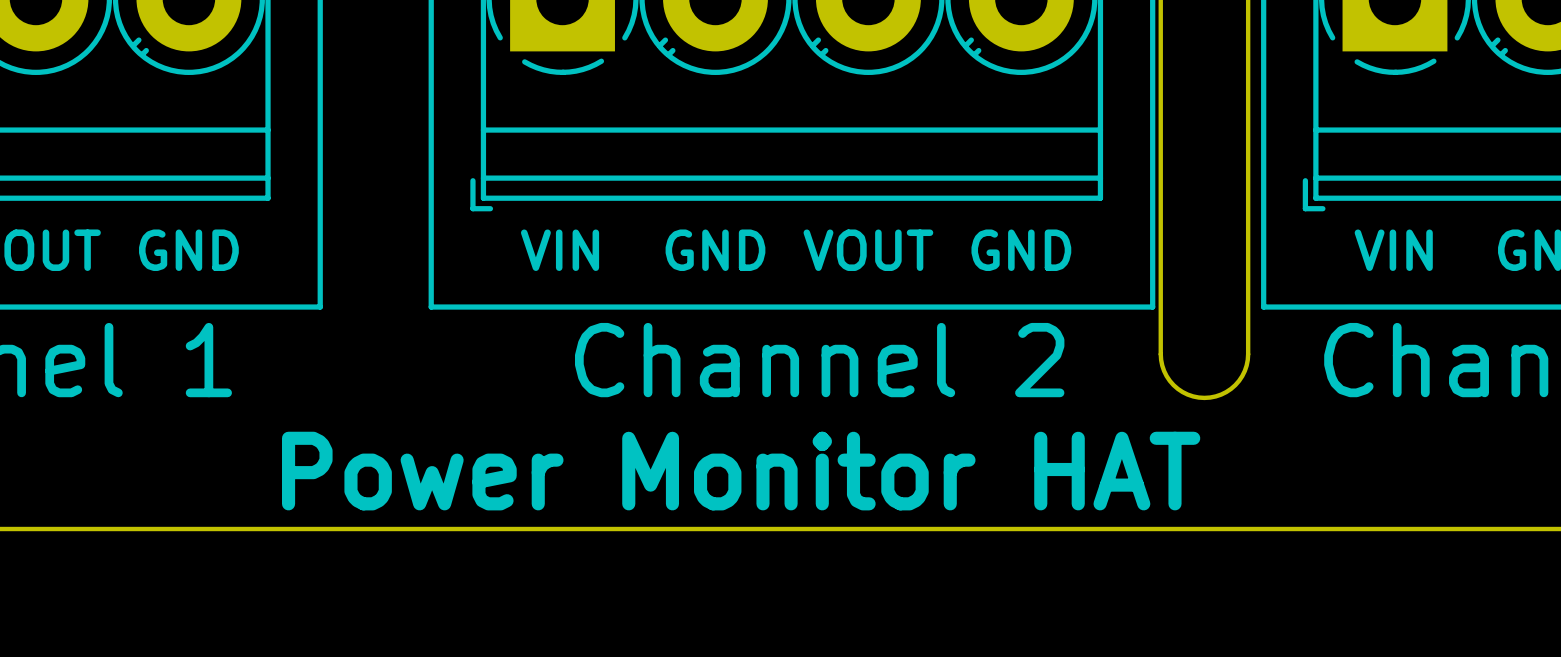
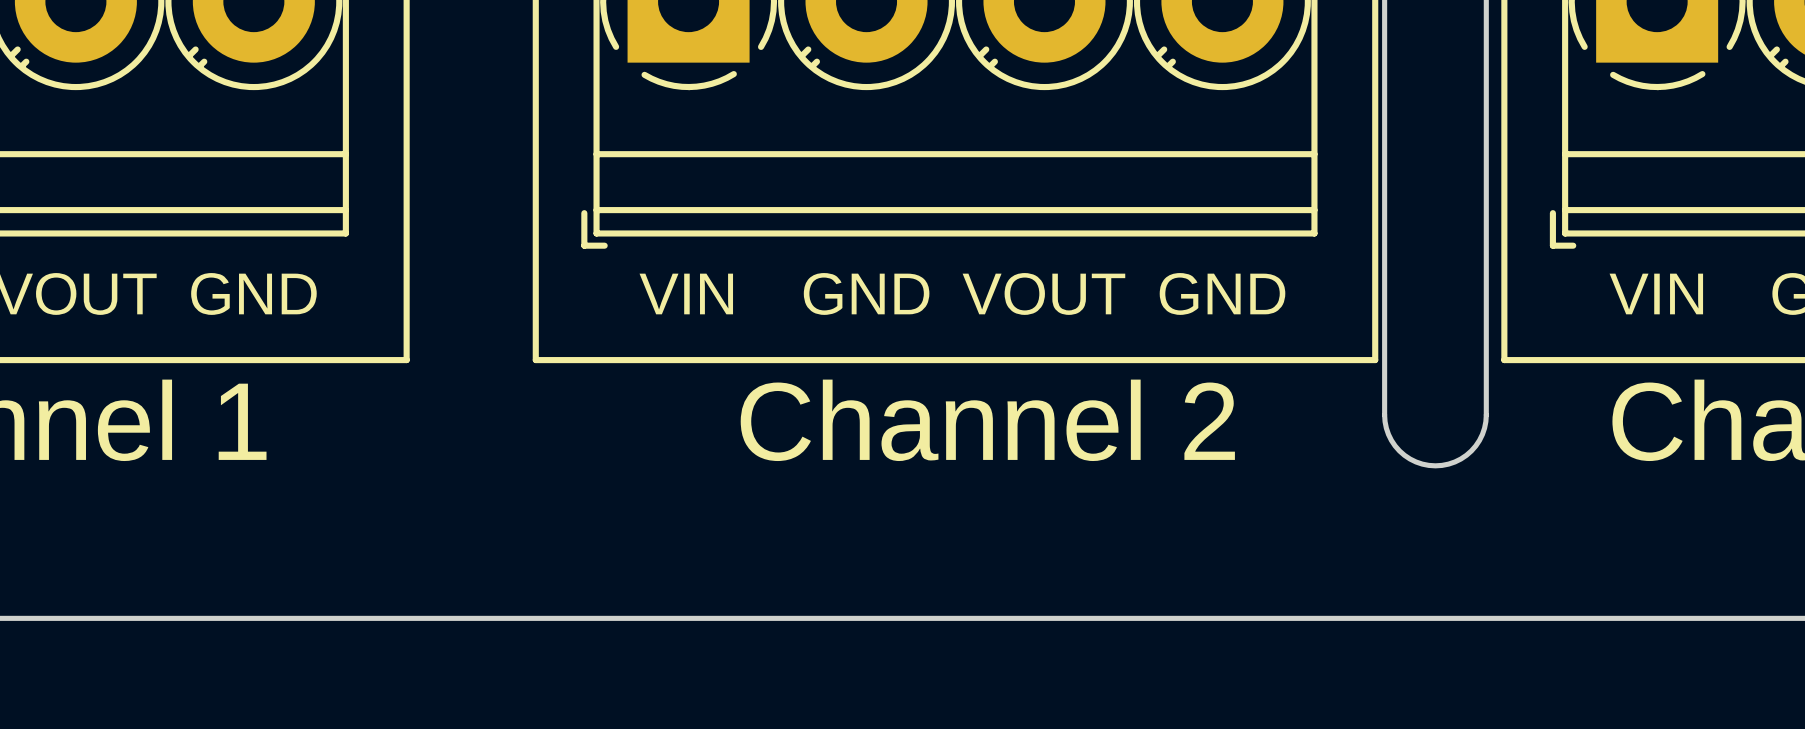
text: Power Monitor HAT (741, 471) -> none

